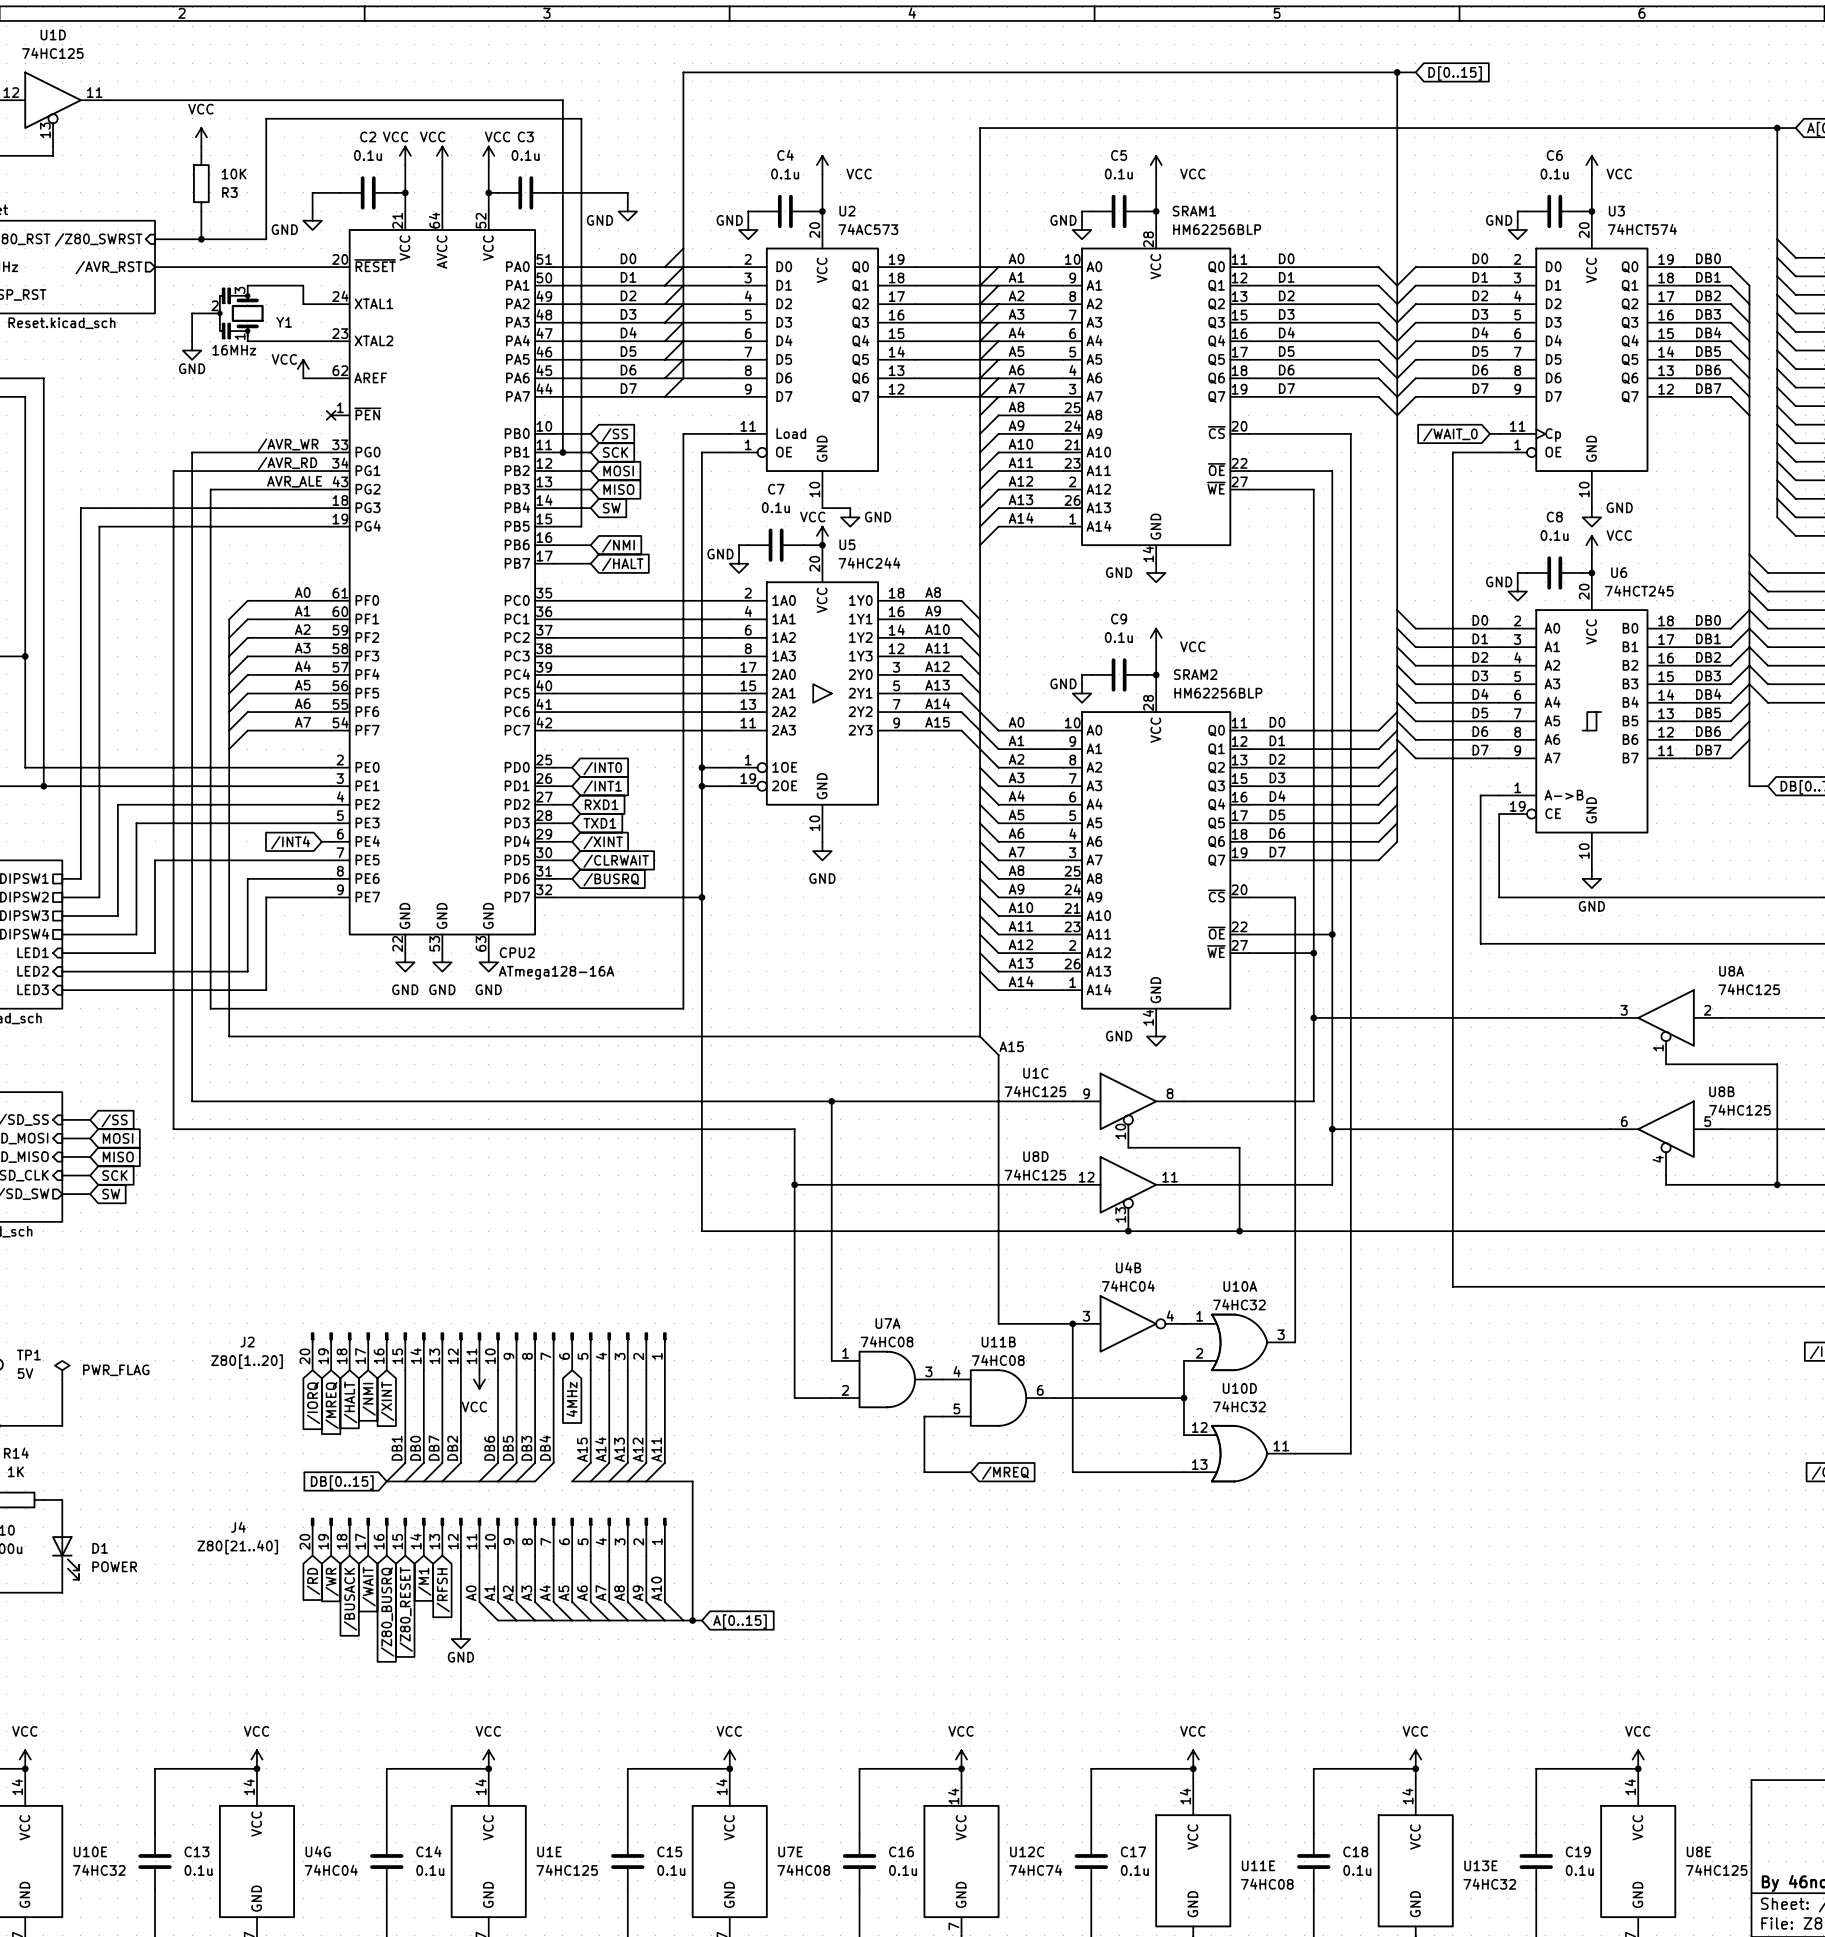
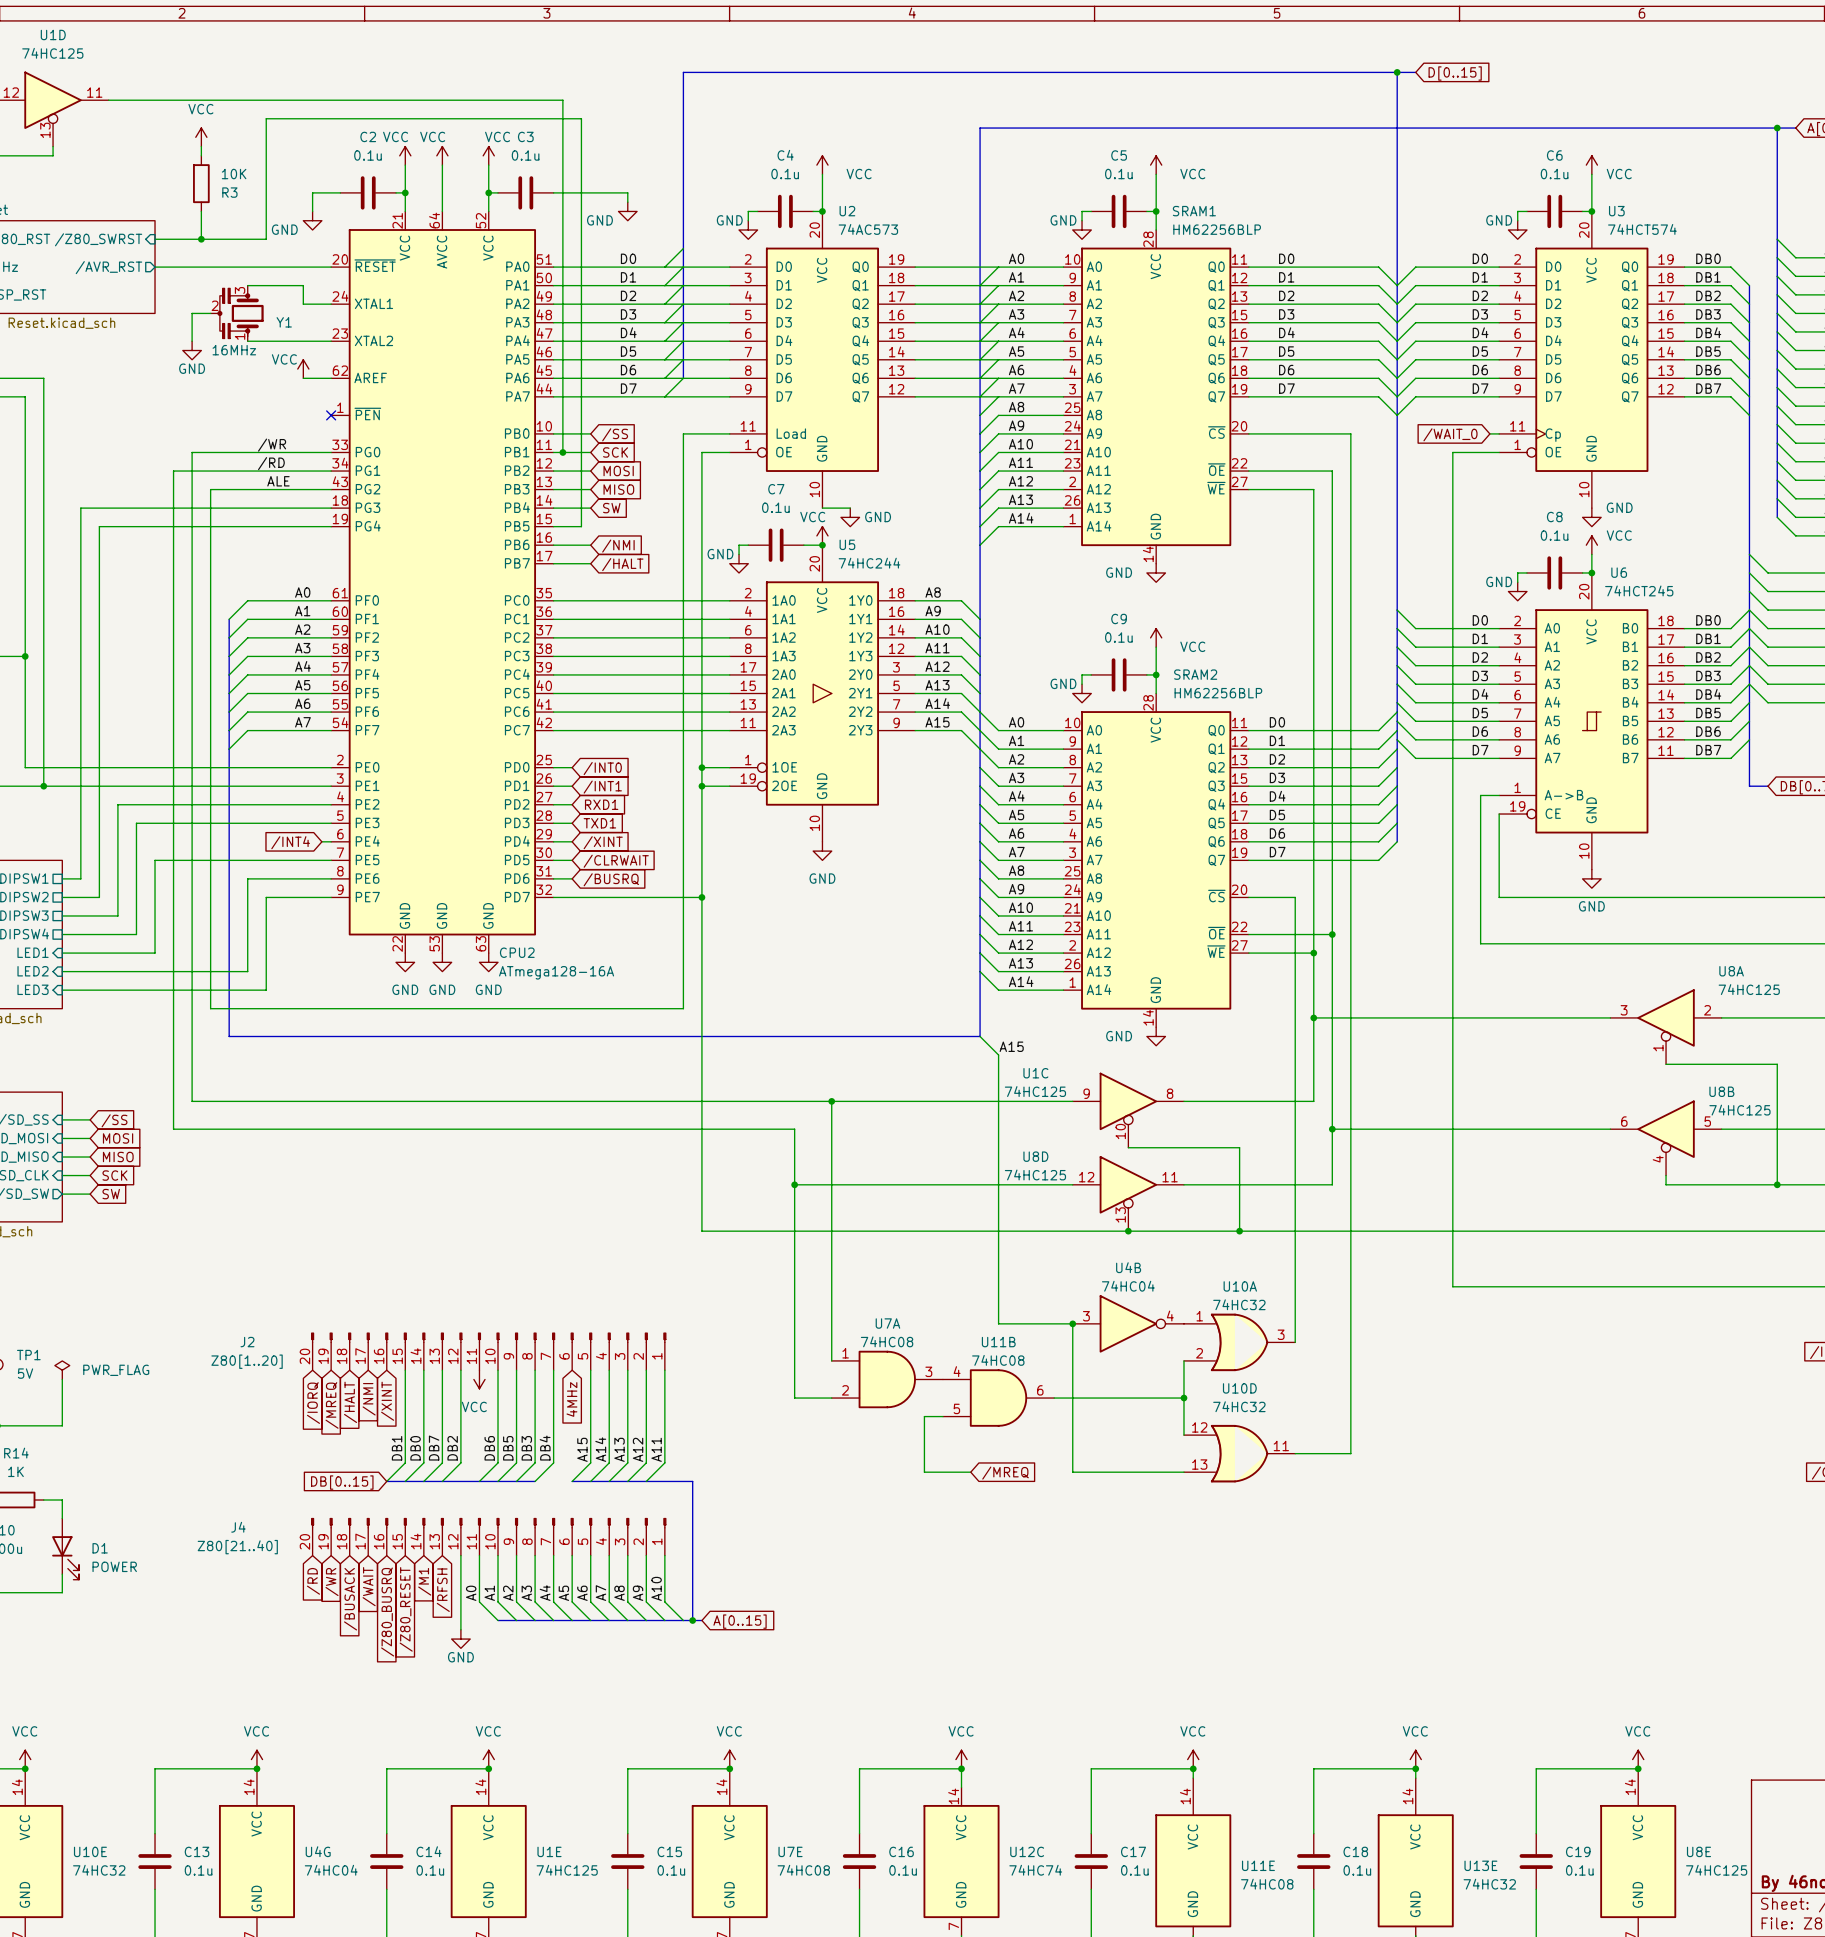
label: /AVR_WR (288, 445) -> /WR (272, 445)
label: /AVR_RD (287, 463) -> /RD (271, 463)
label: AVR_ALE (294, 481) -> ALE (278, 481)

